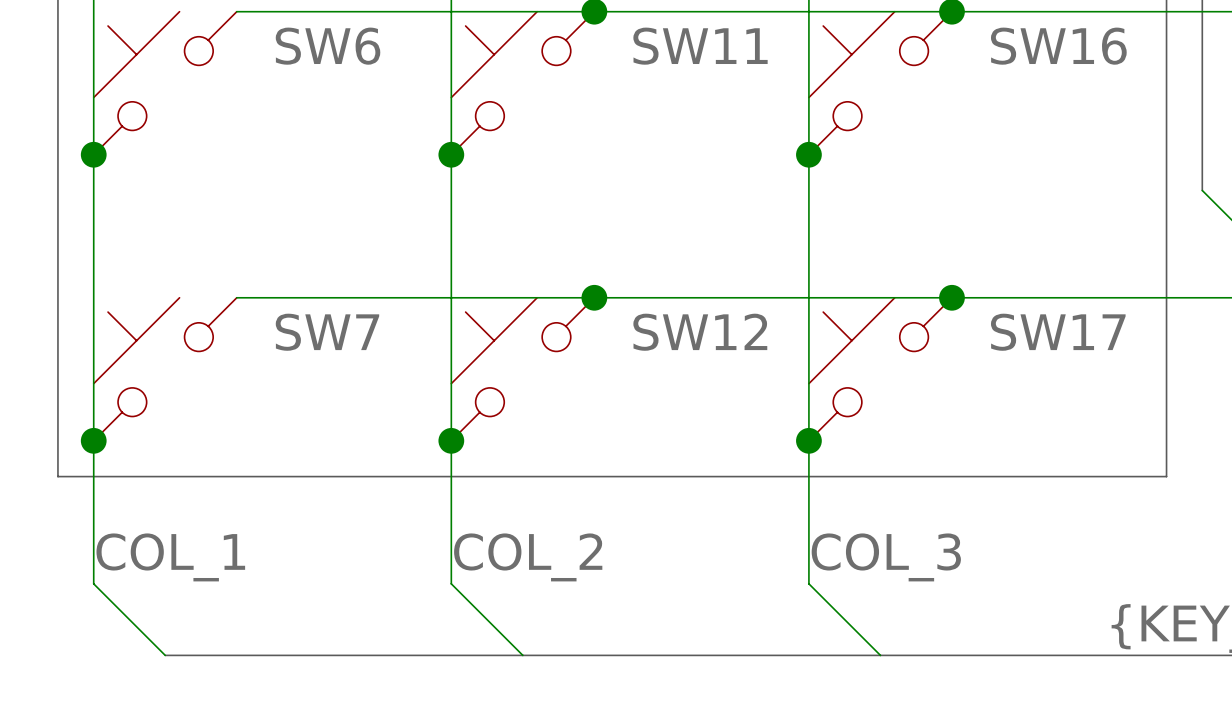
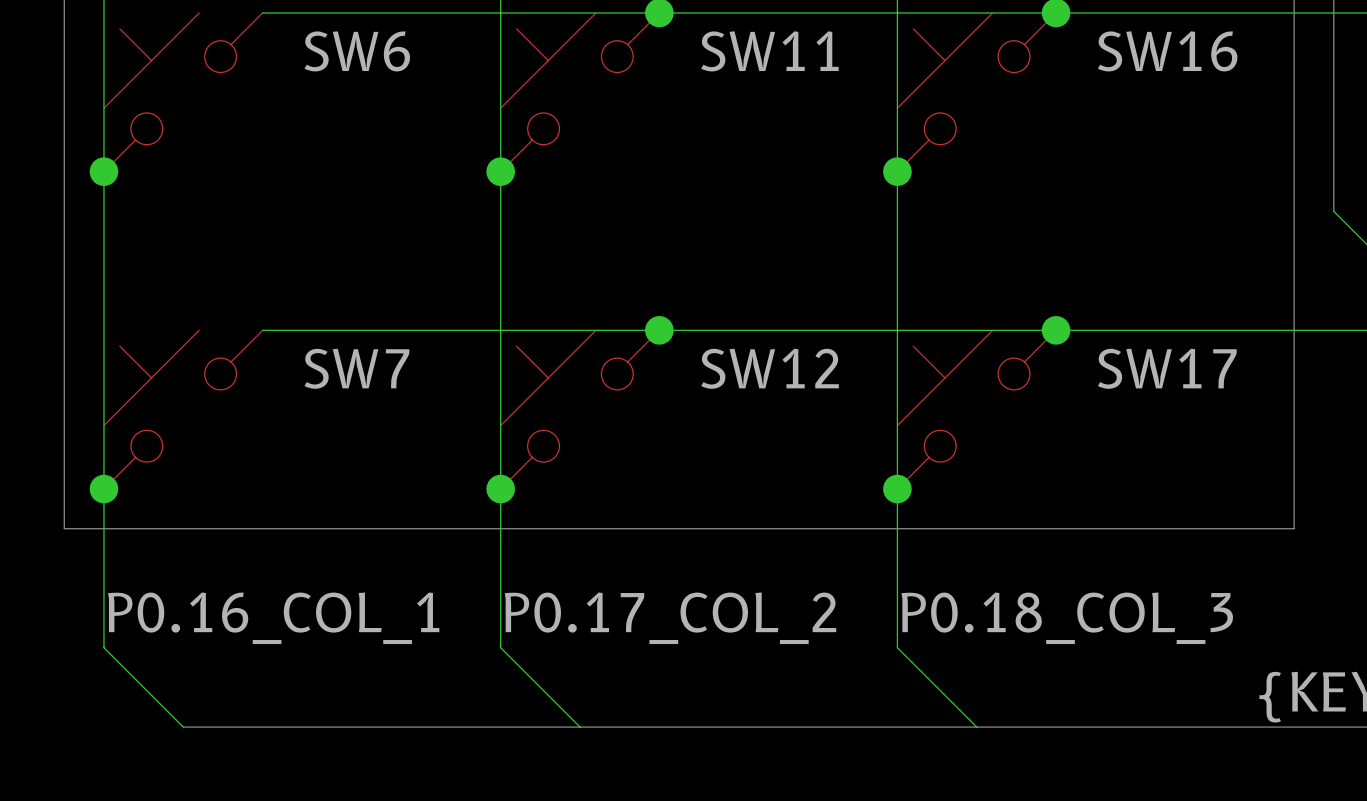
label: COL_1 (170, 557) -> P0.16_COL_1 (273, 618)
label: COL_2 (528, 557) -> P0.17_COL_2 (670, 618)
label: COL_3 (886, 557) -> P0.18_COL_3 (1067, 618)

